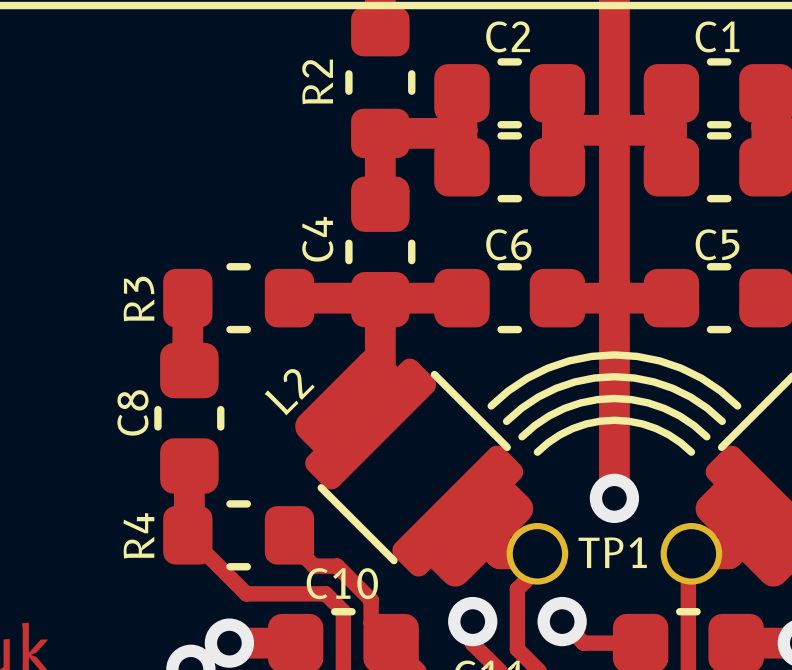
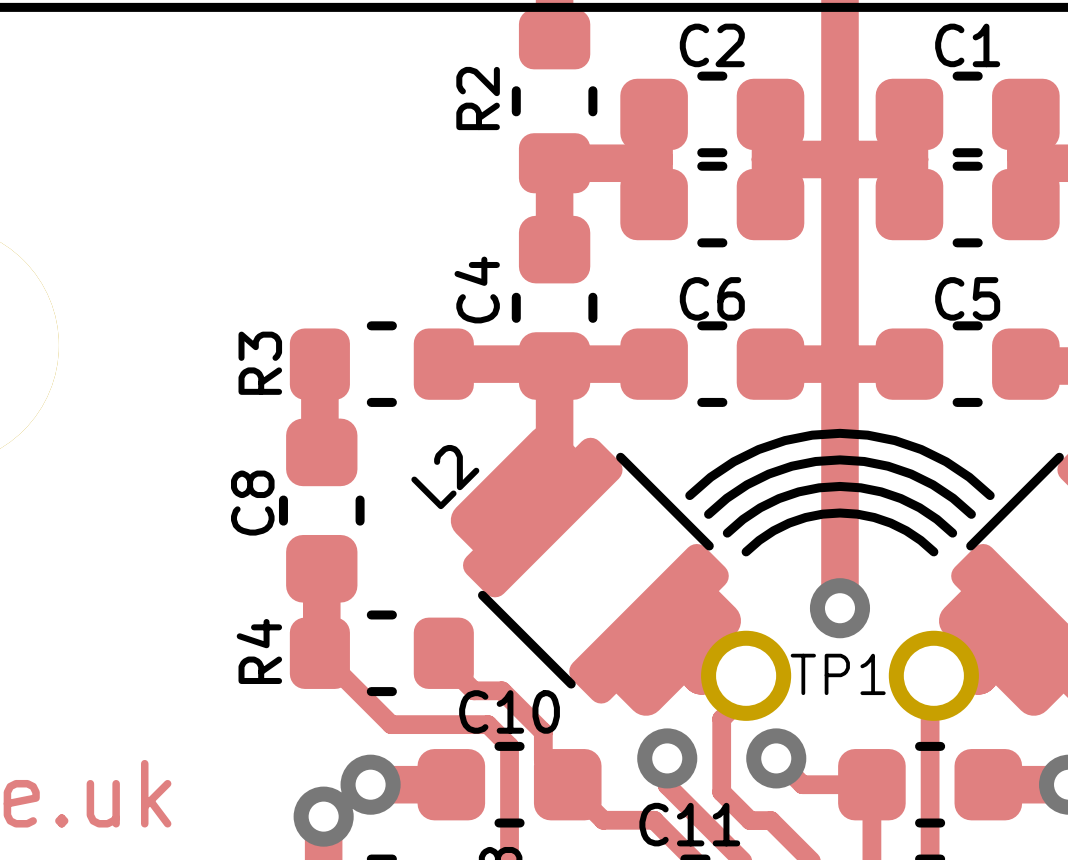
TP1 footprint: [506, 523, 723, 585] -> [701, 630, 979, 721]

